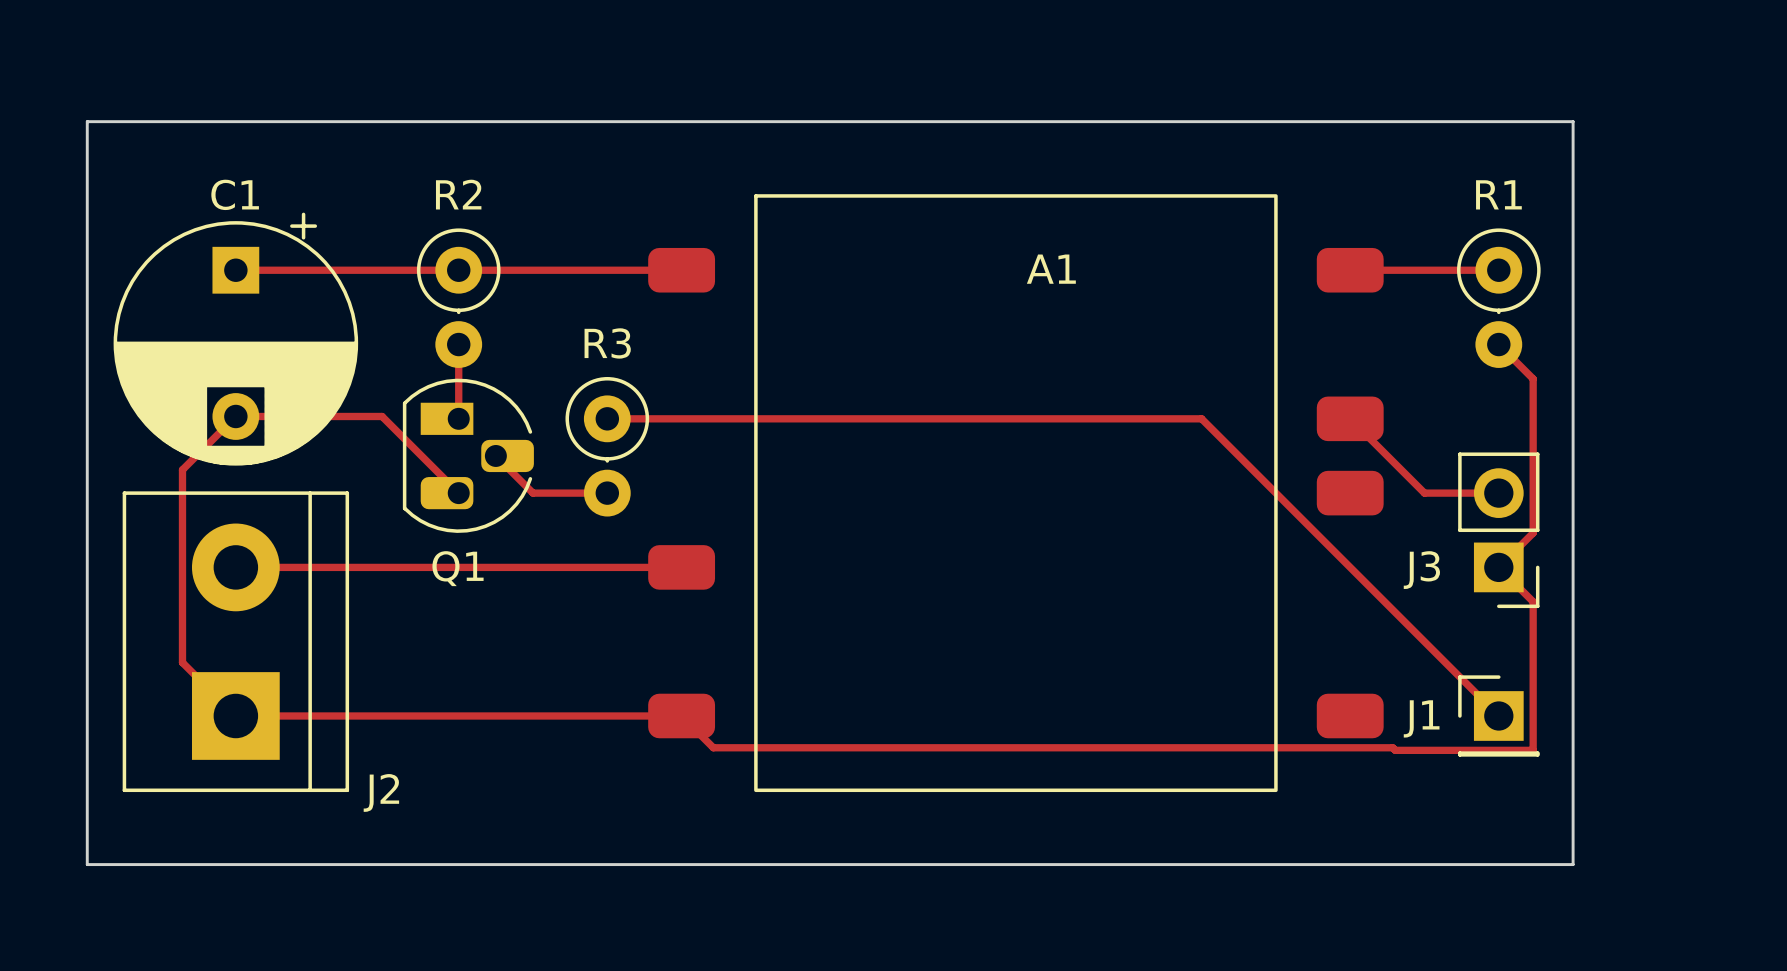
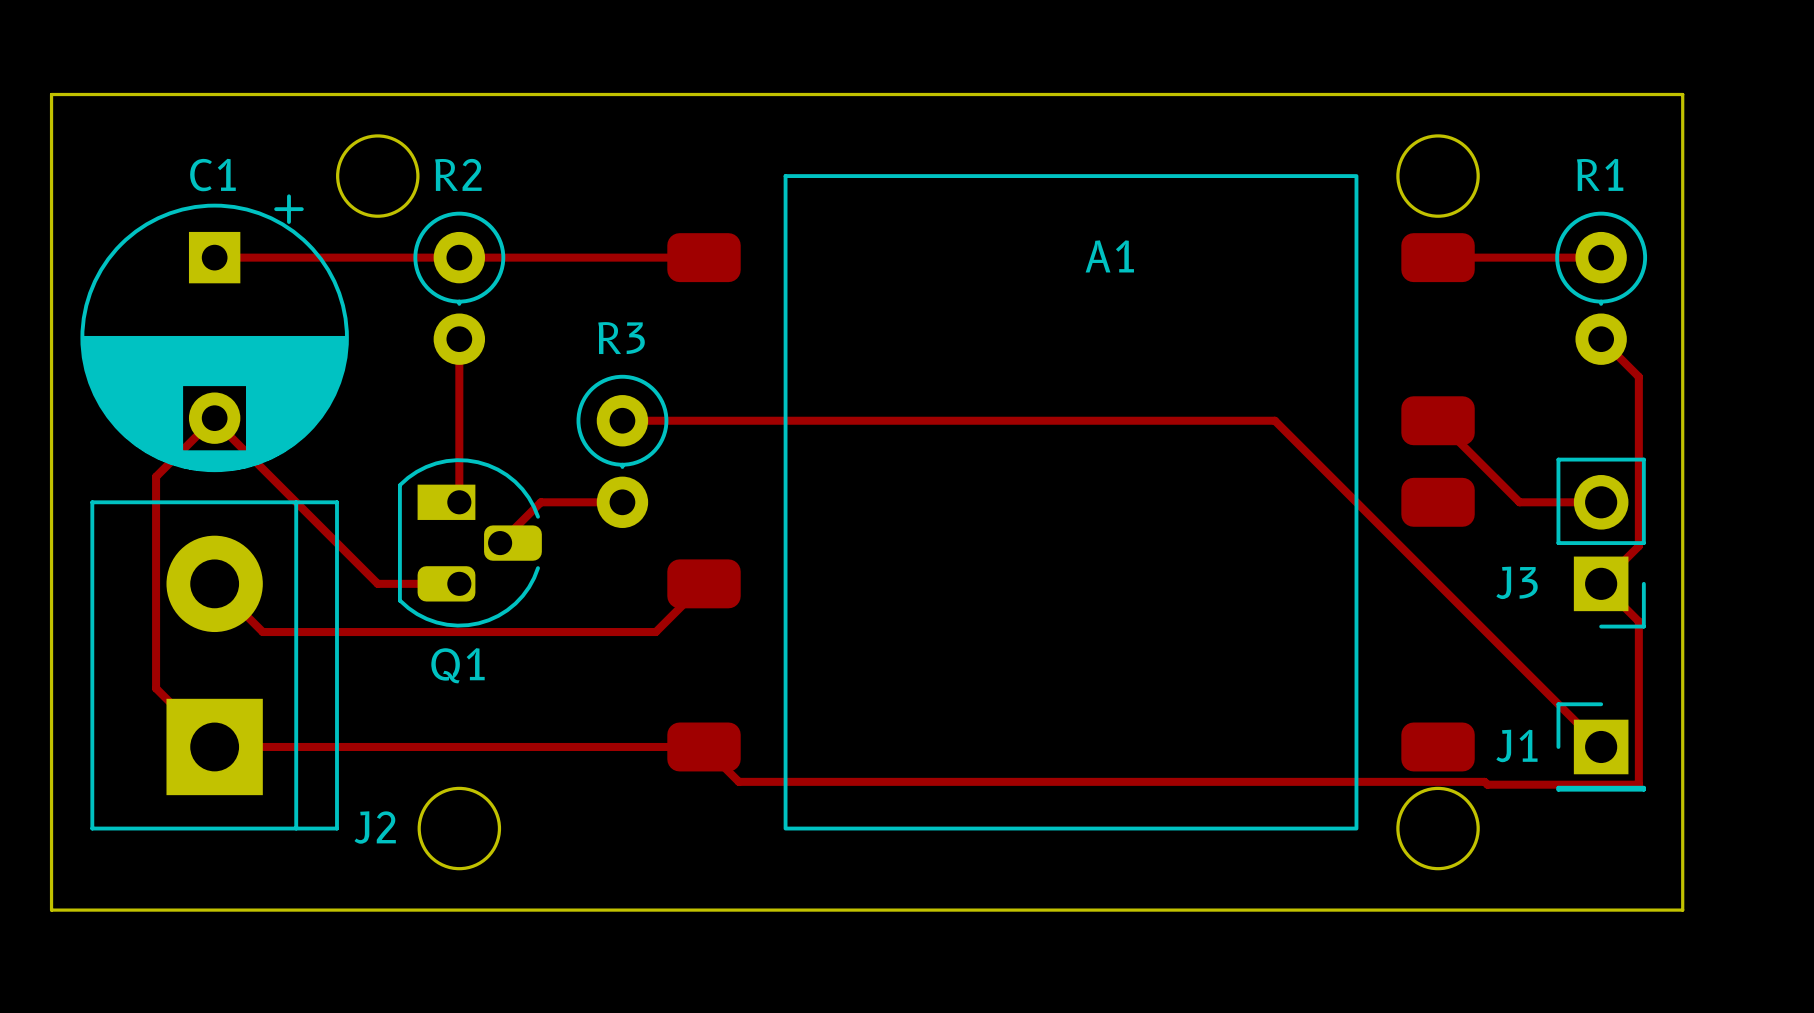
round board edge: none -> [336, 134, 420, 218]
round board edge: none -> [1396, 134, 1480, 218]
track: (235, 416) (382, 416) (458, 493) -> (459, 420) (459, 502)
Q1 position: (468, 455) -> (469, 542)
track: (495, 455) (533, 493) -> (500, 543) (540, 502)
track: (235, 567) (384, 567) -> (214, 420) (377, 583)
track: (458, 567) (681, 567) -> (214, 583) (262, 632) (655, 632) (704, 583)
round board edge: none -> [417, 786, 502, 871]
round board edge: none -> [1396, 786, 1480, 871]

